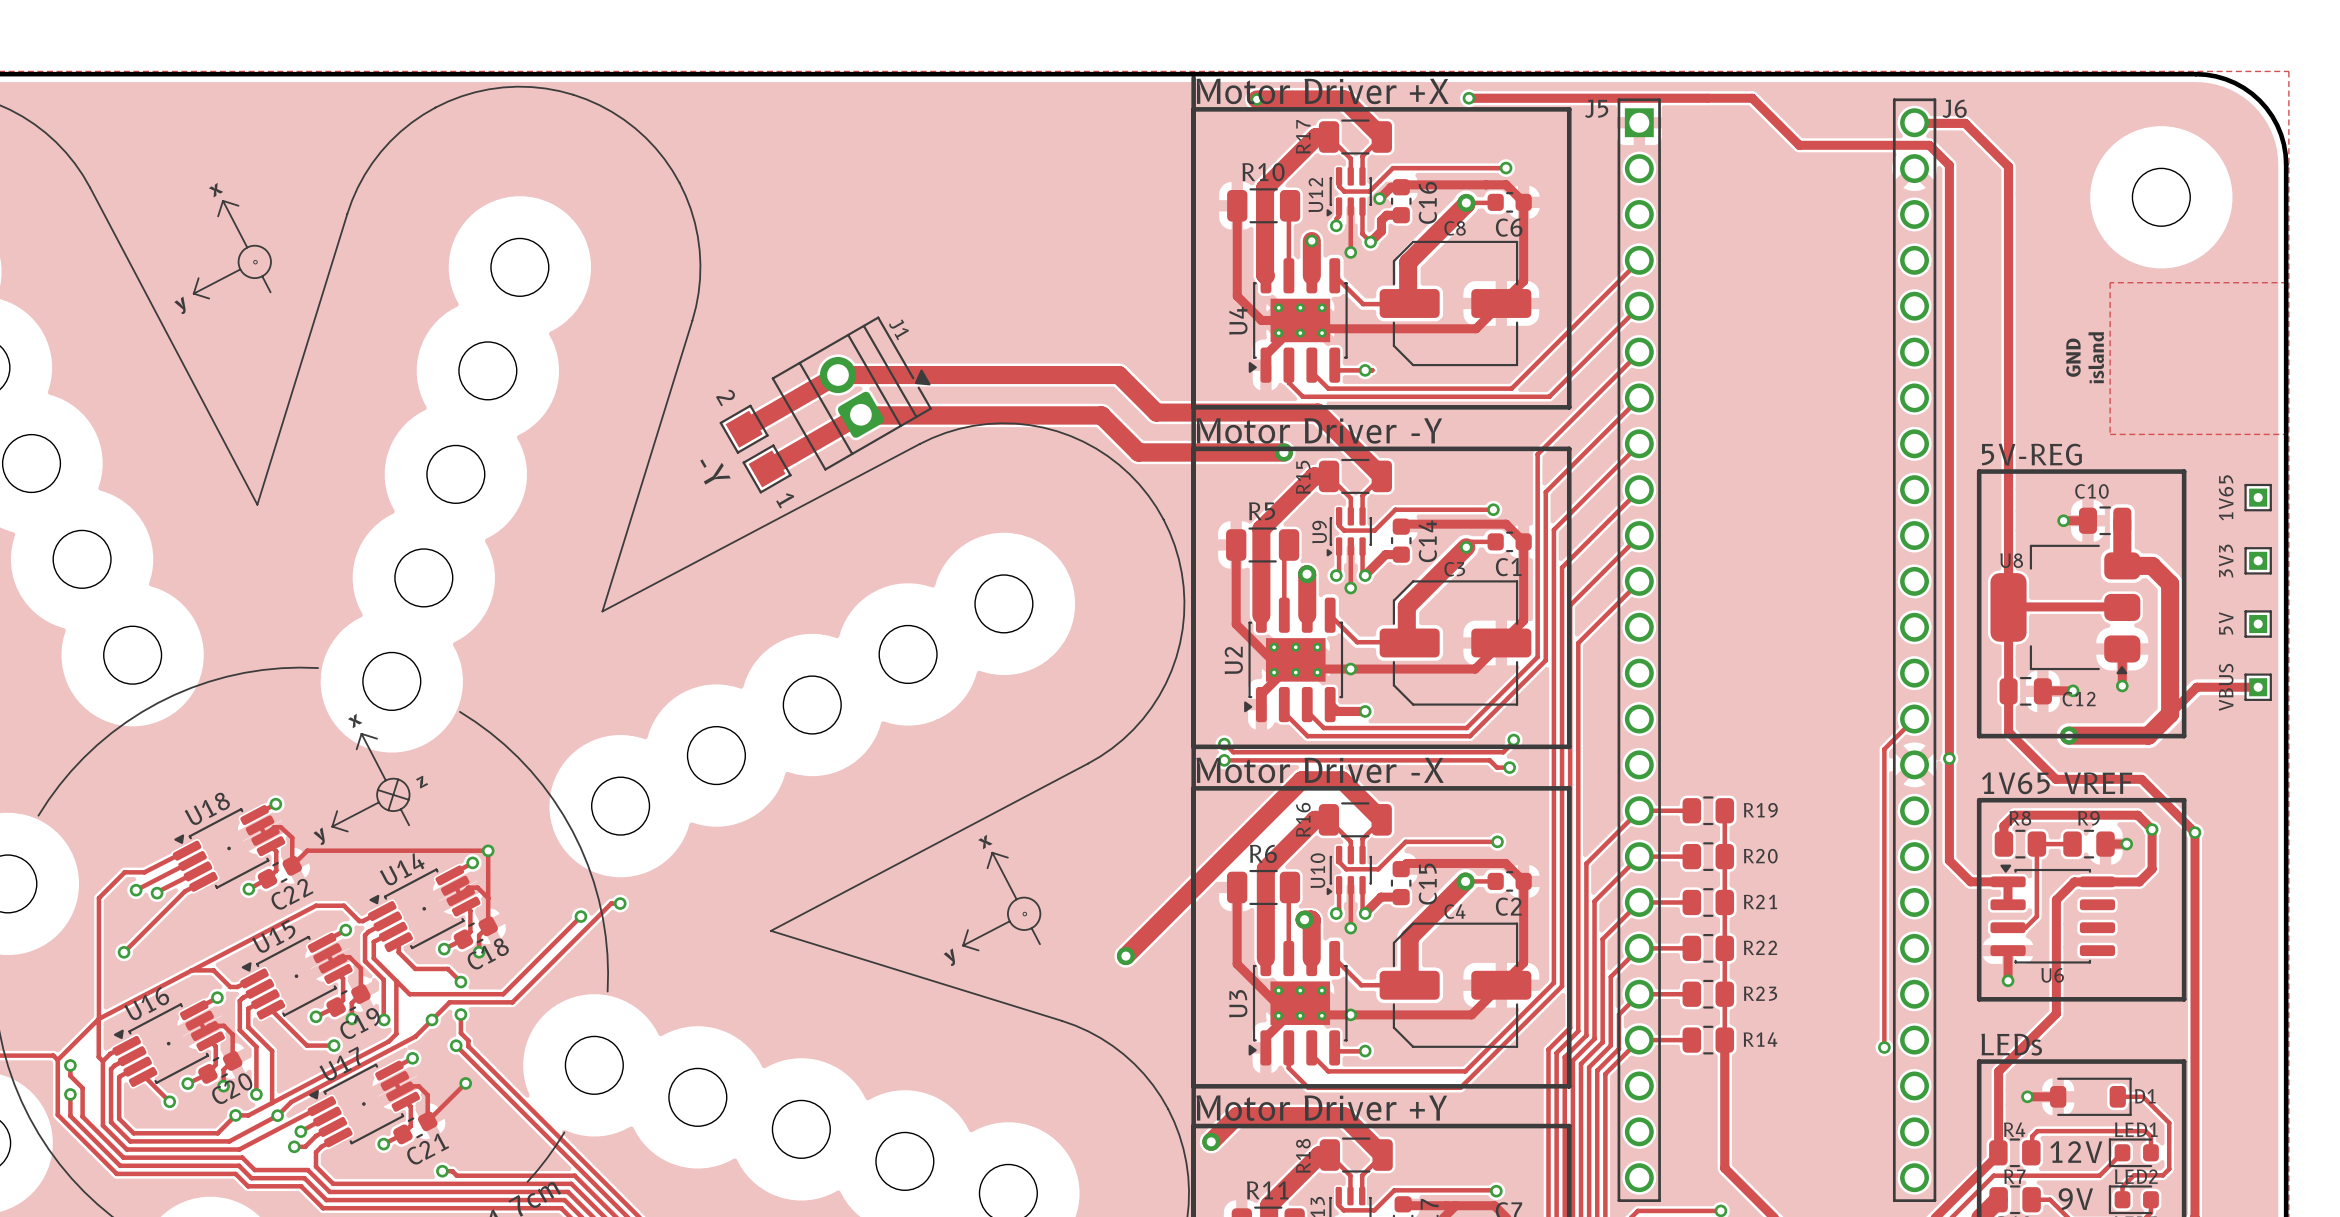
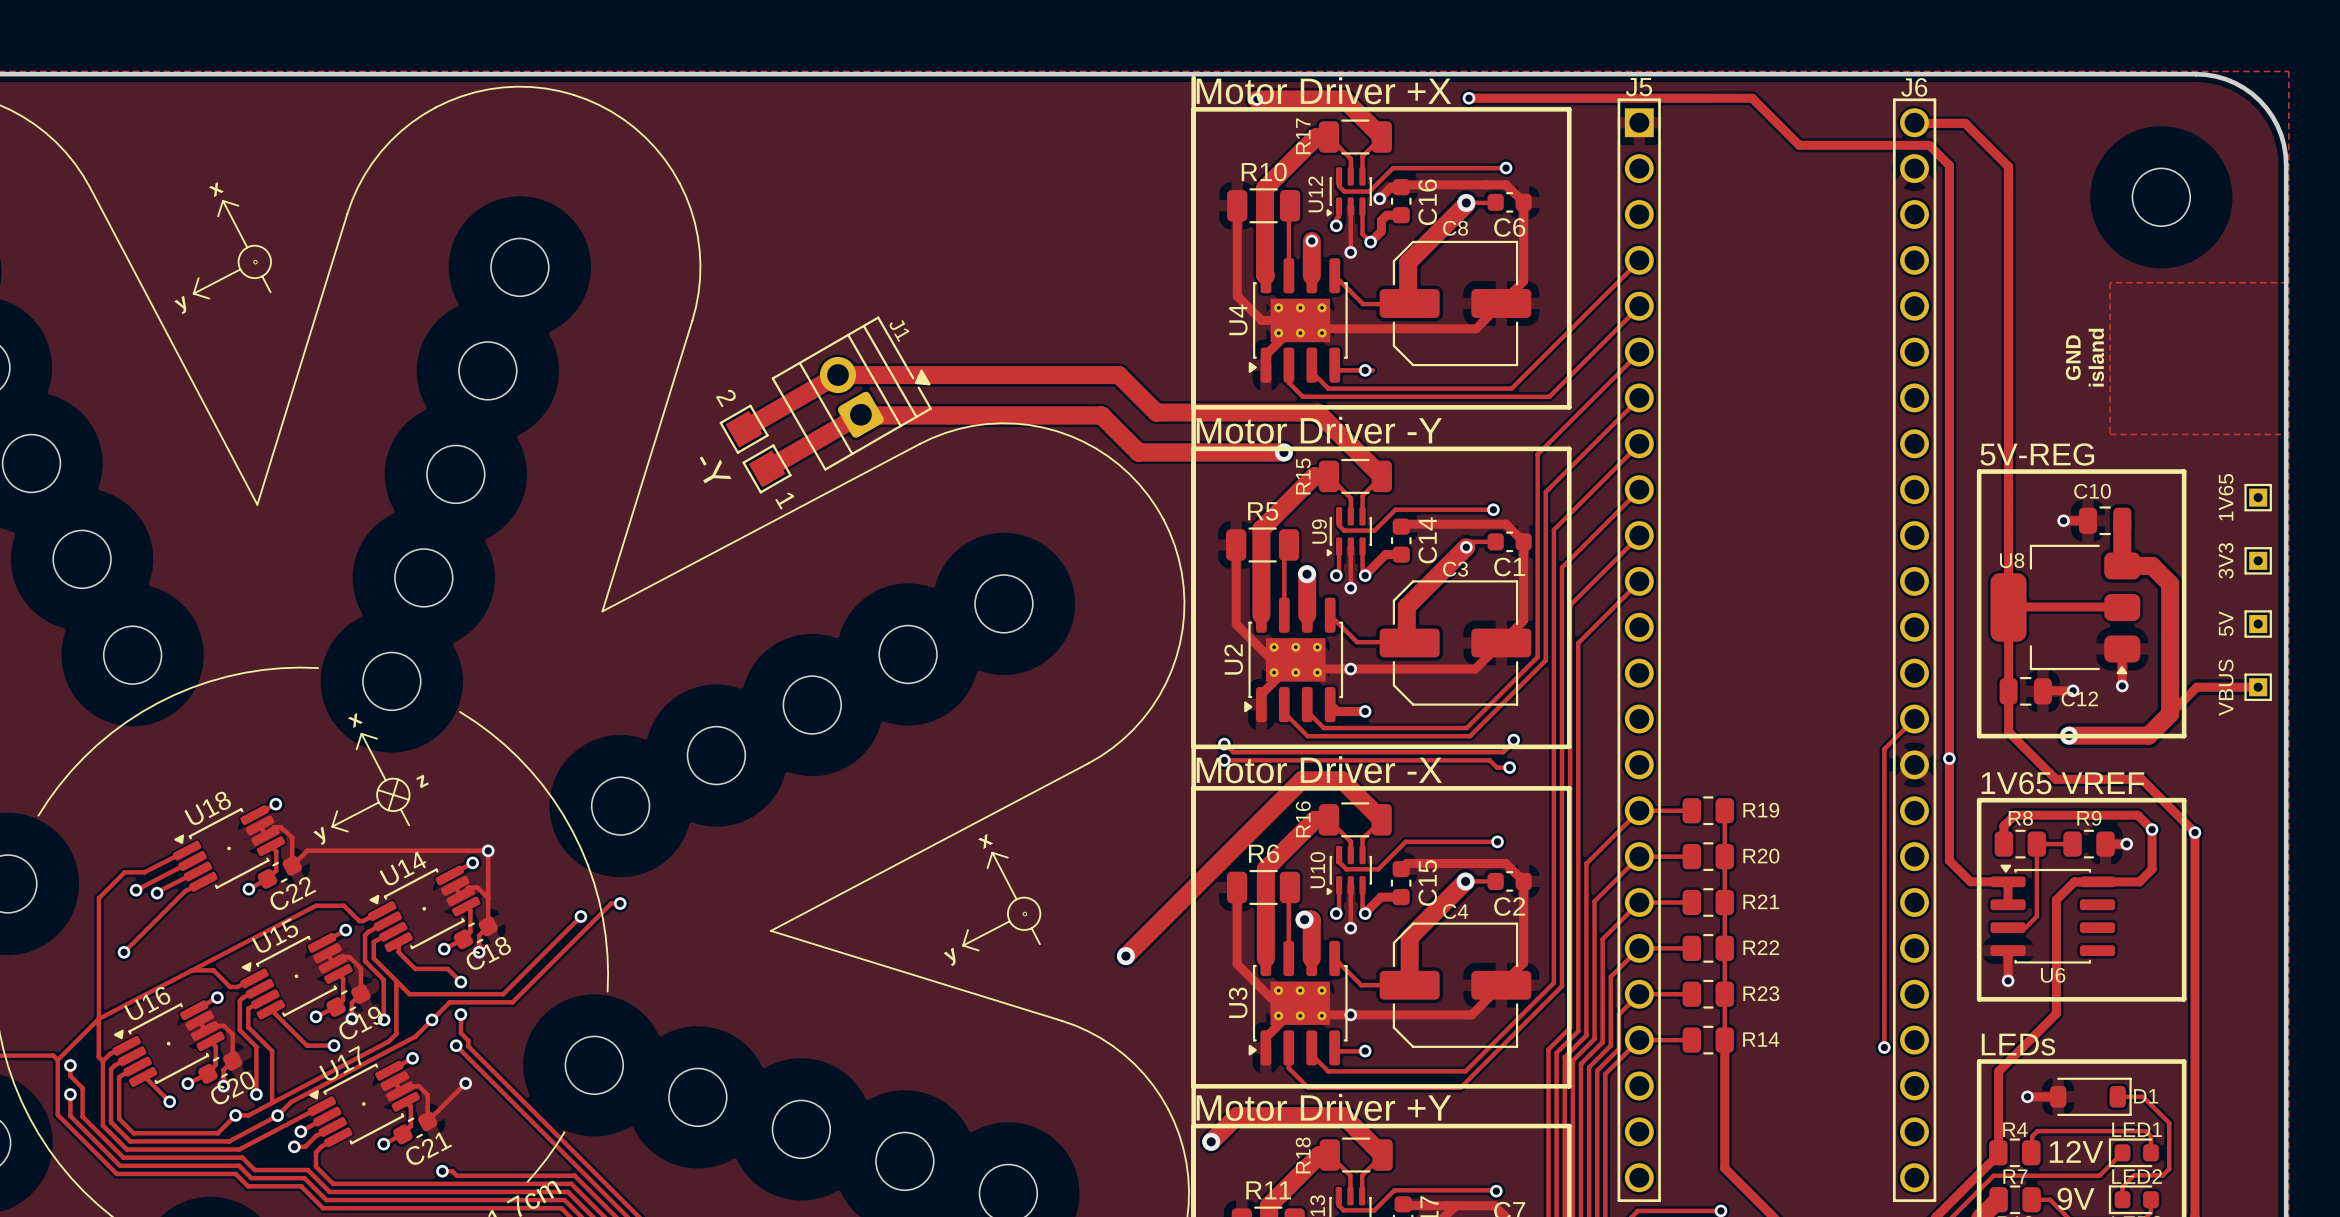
J5 position: (1596, 108) -> (1638, 87)
J6 position: (1954, 108) -> (1914, 87)

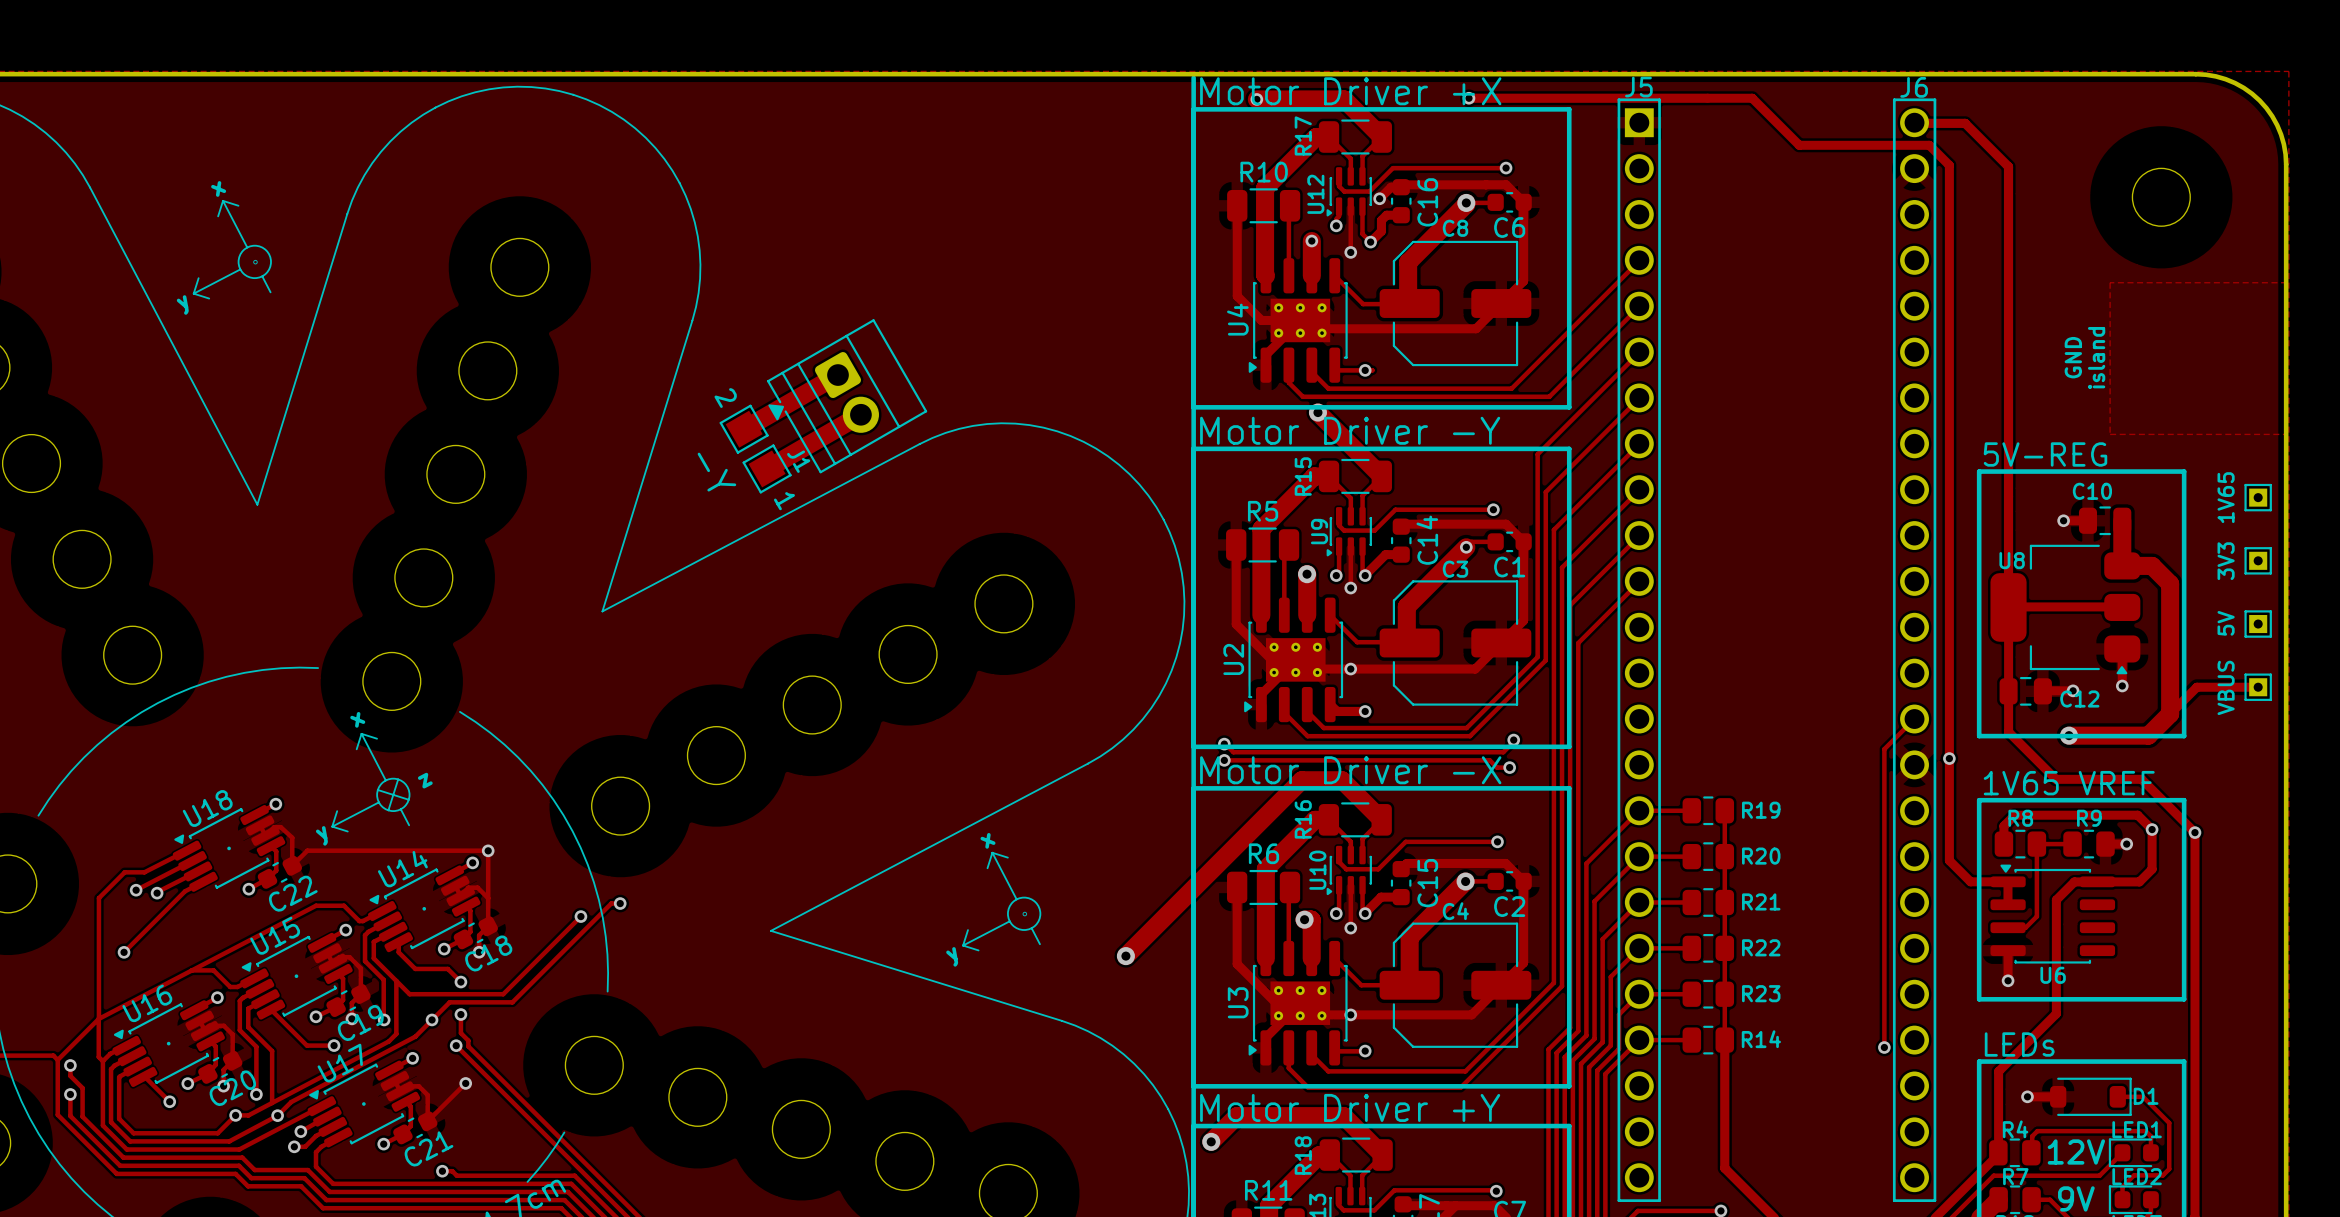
track: (837, 375) (1118, 375) (1156, 412) (1317, 412) -> none
J1 rotation: 0° (851, 393) -> 180° (847, 396)
track: (861, 415) (1101, 415) (1138, 452) (1283, 452) -> none
via position: (1283, 452) -> (1317, 412)

